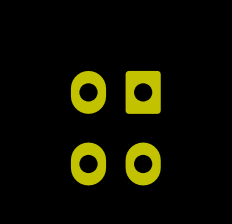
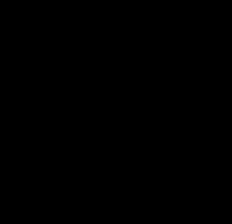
part: (115, 128) -> none

